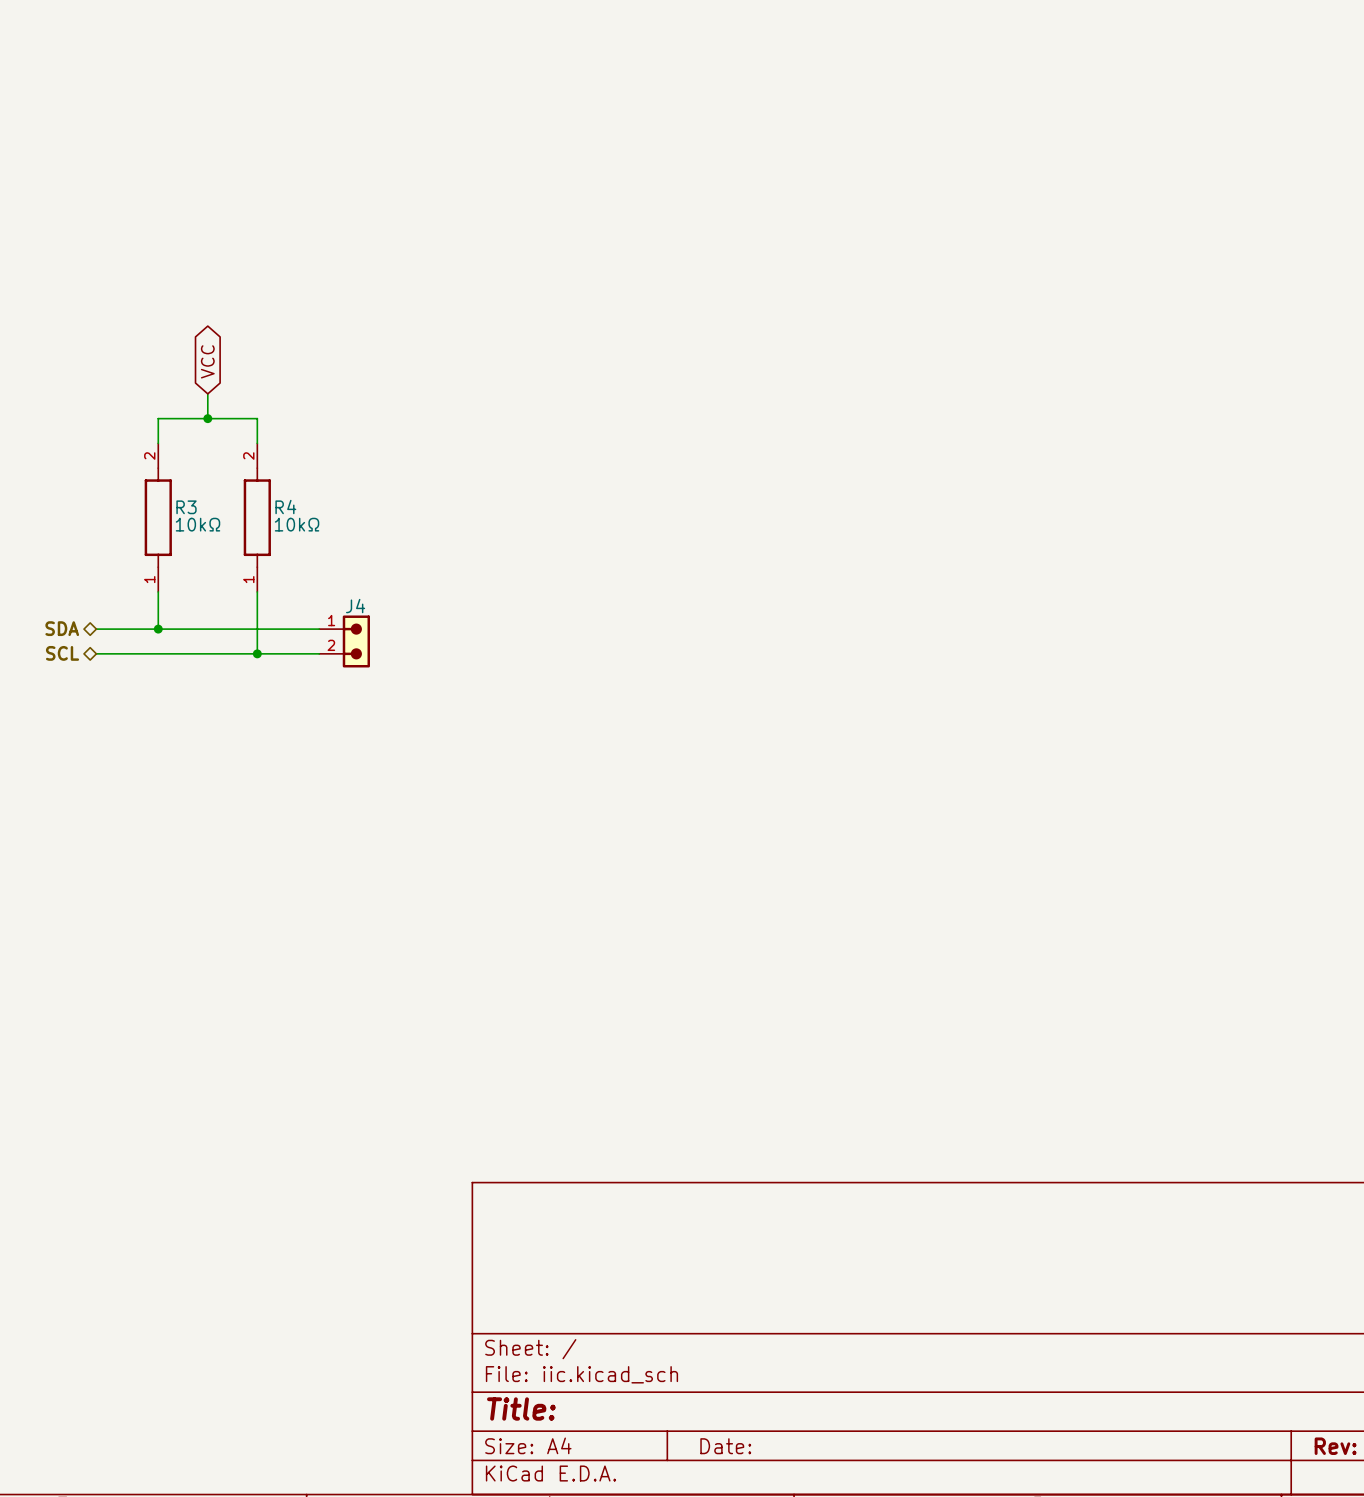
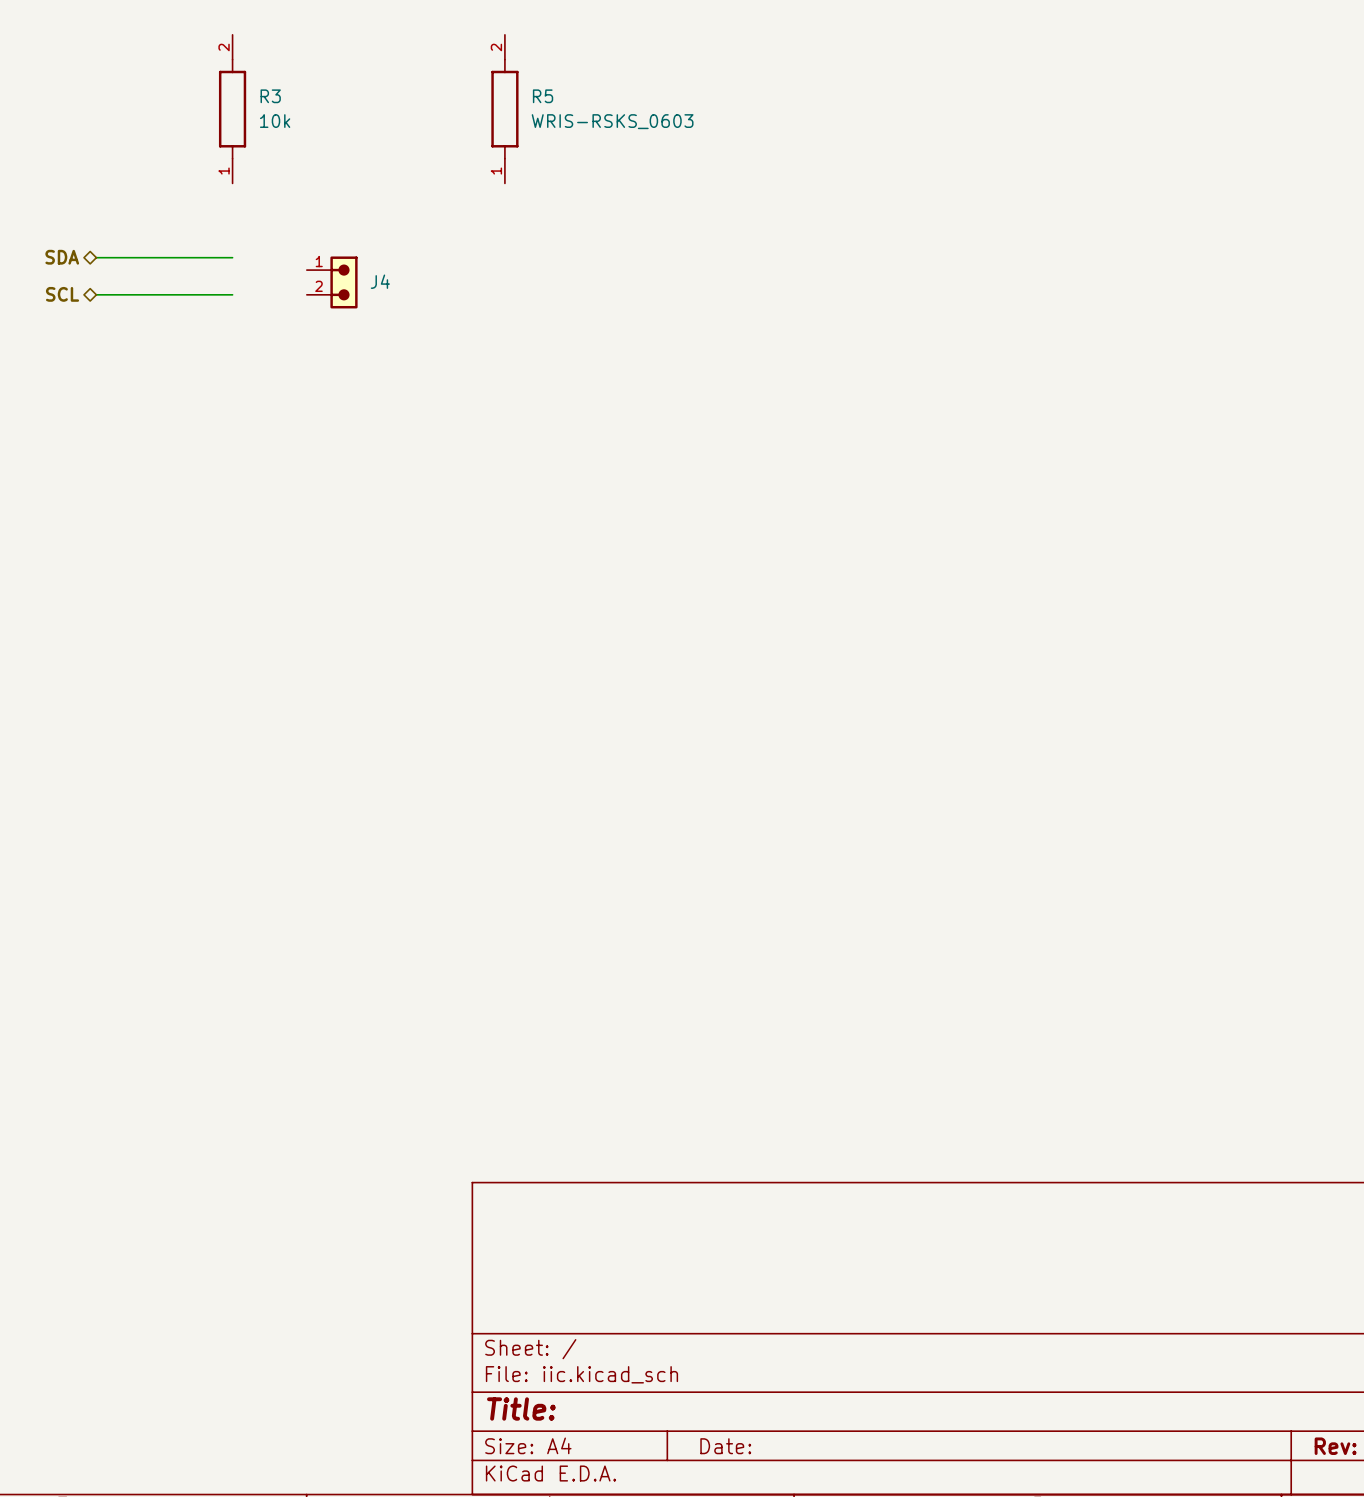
R5: none -> WRIS-RSKS_0603 (504, 109)
hierarchical label: none -> SDA (62, 257)
wire: none -> (96, 257) (232, 257)
hierarchical label: none -> SCL (62, 294)
wire: none -> (96, 294) (232, 294)
global label: VCC (207, 361) -> none
wire: (207, 393) (207, 418) -> none
junction: (207, 418) -> none
wire: (158, 443) (158, 418) (257, 418) (257, 443) -> none
R3 name position: R3 (186, 507) -> R3 (270, 96)
R3 position: (158, 517) -> (232, 109)
R4: 10kΩ (257, 517) -> none
R3 value: 10kΩ (197, 524) -> 10k (275, 121)
wire: (158, 591) (158, 629) -> none
wire: (257, 591) (257, 653) -> none
J4 name position: J4 (355, 606) -> J4 (380, 281)
hierarchical label: SDA (62, 628) -> none
wire: (96, 629) (319, 629) -> none
junction: (158, 629) -> none
J4 position: (344, 641) -> (332, 282)
hierarchical label: SCL (62, 653) -> none
wire: (96, 653) (319, 653) -> none
junction: (257, 653) -> none

